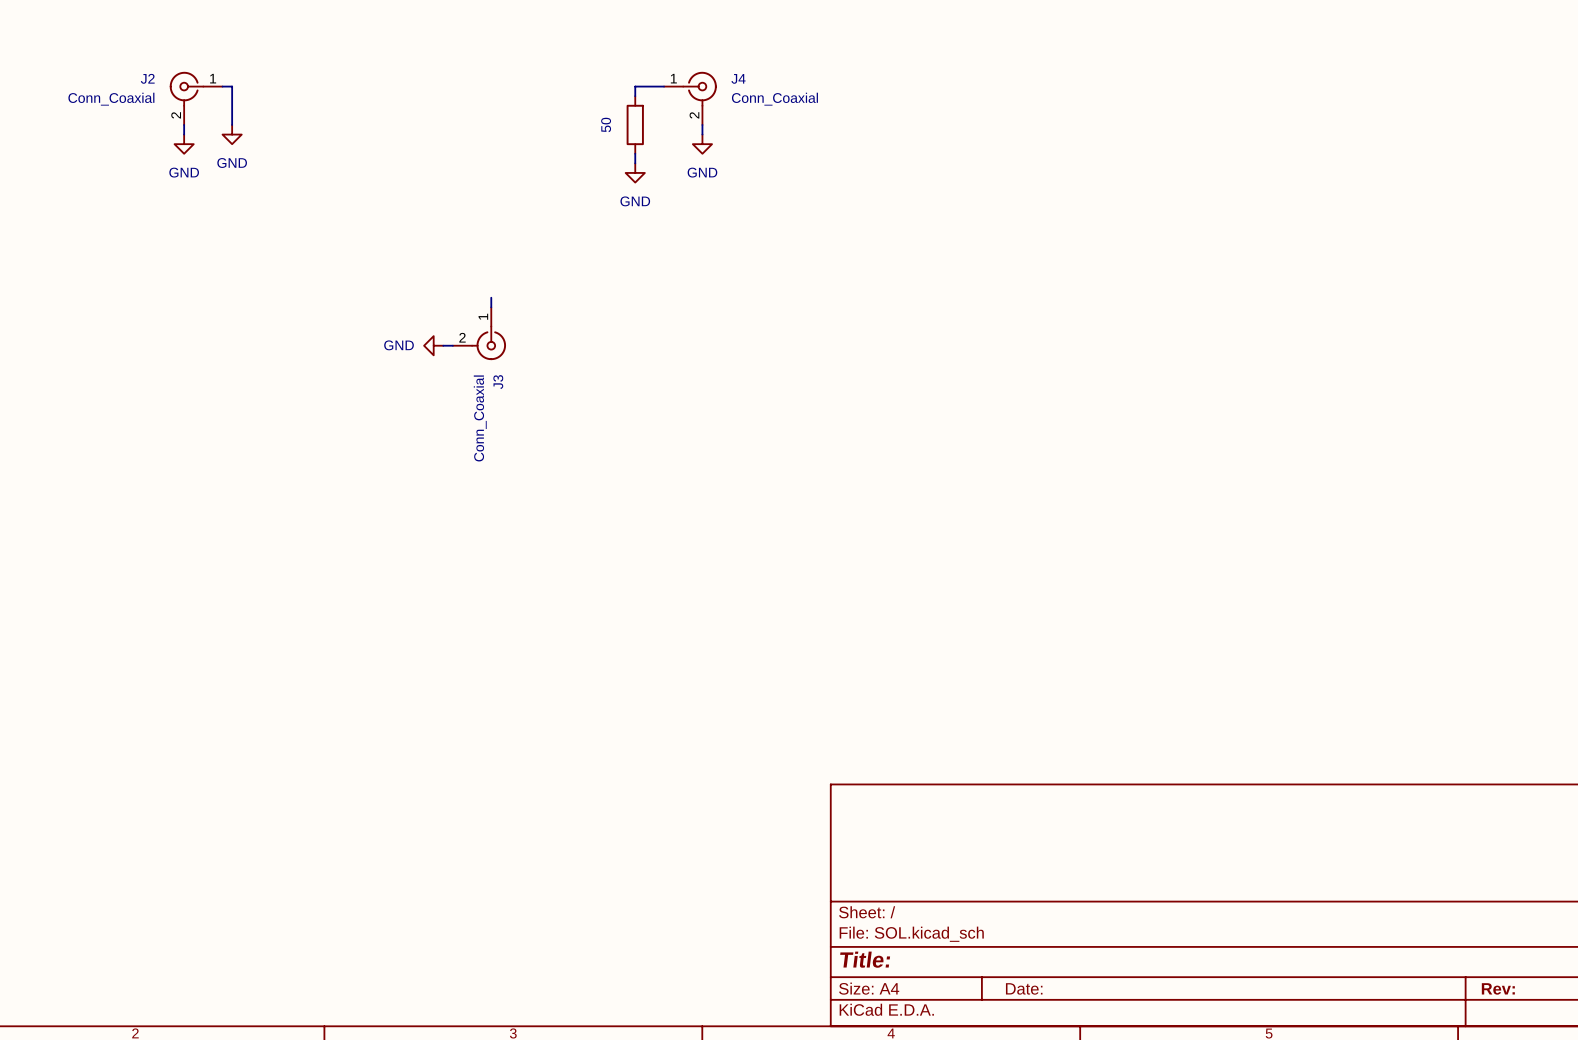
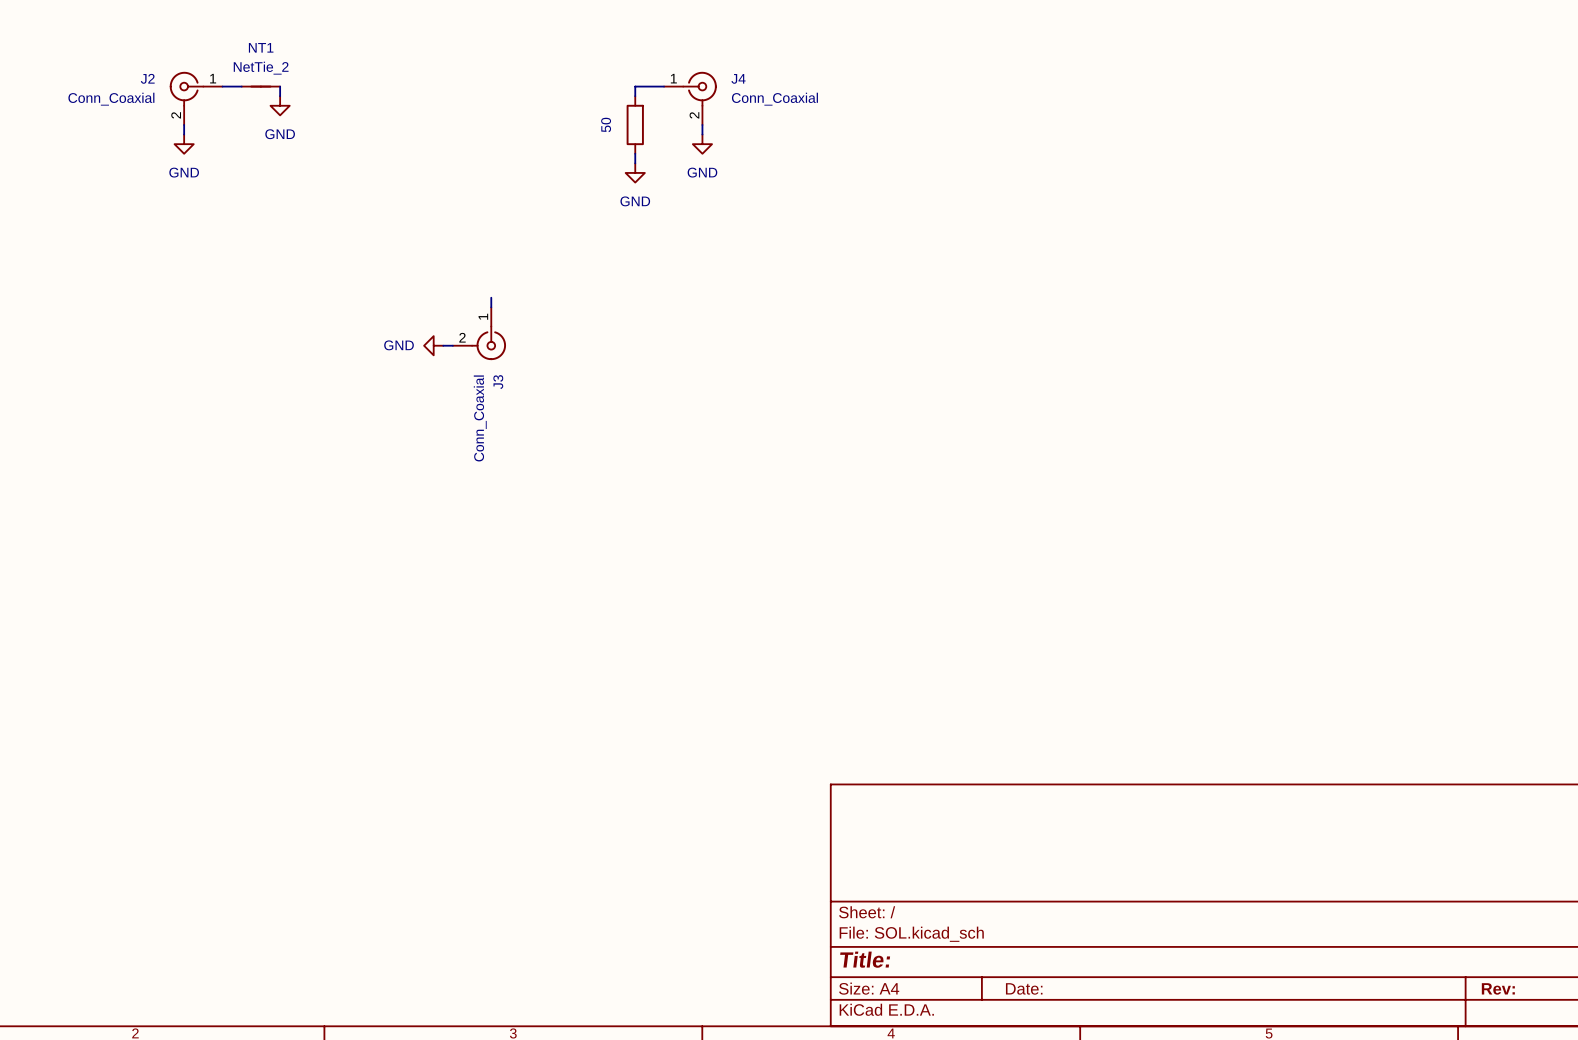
wire: (232, 86) (232, 124) -> (232, 86) (241, 86)
NT1: none -> NetTie_2 (260, 86)
wire: none -> (280, 86) (280, 96)
power symbol position: GND (232, 134) -> GND (280, 105)

